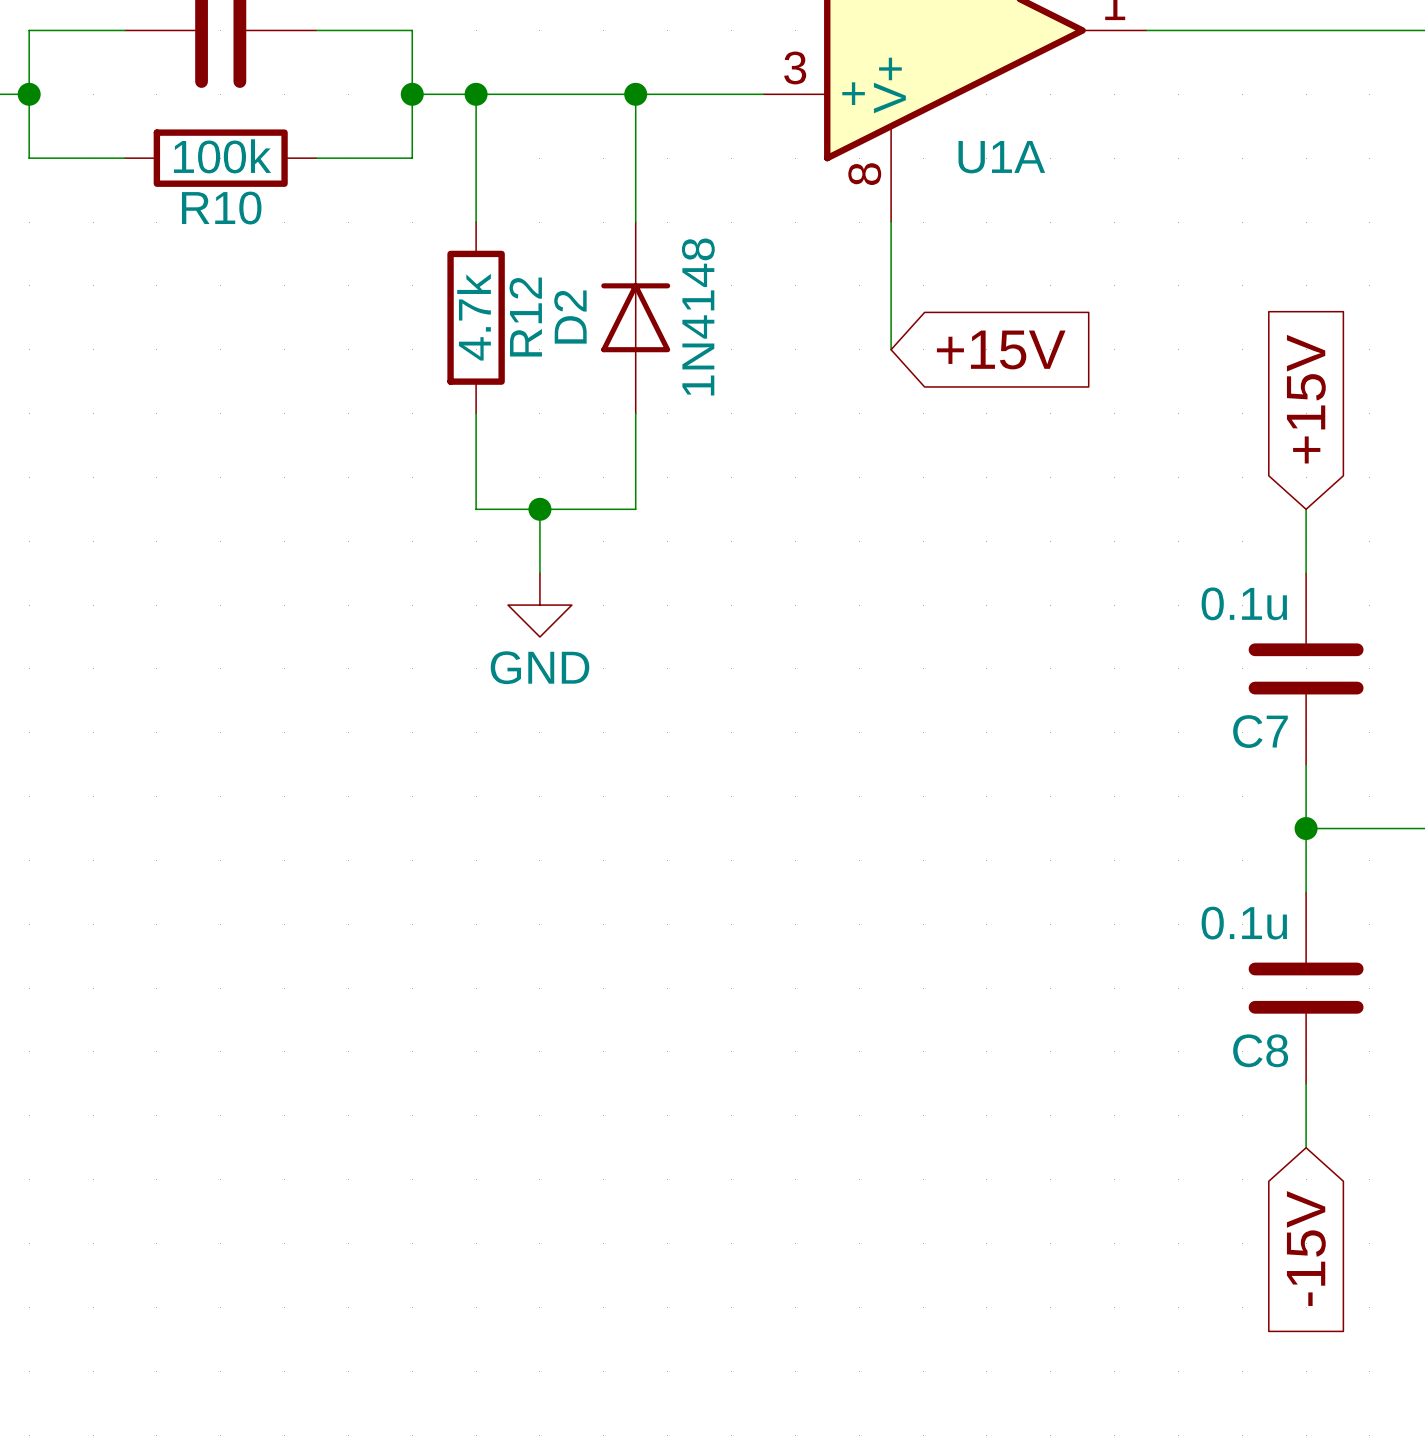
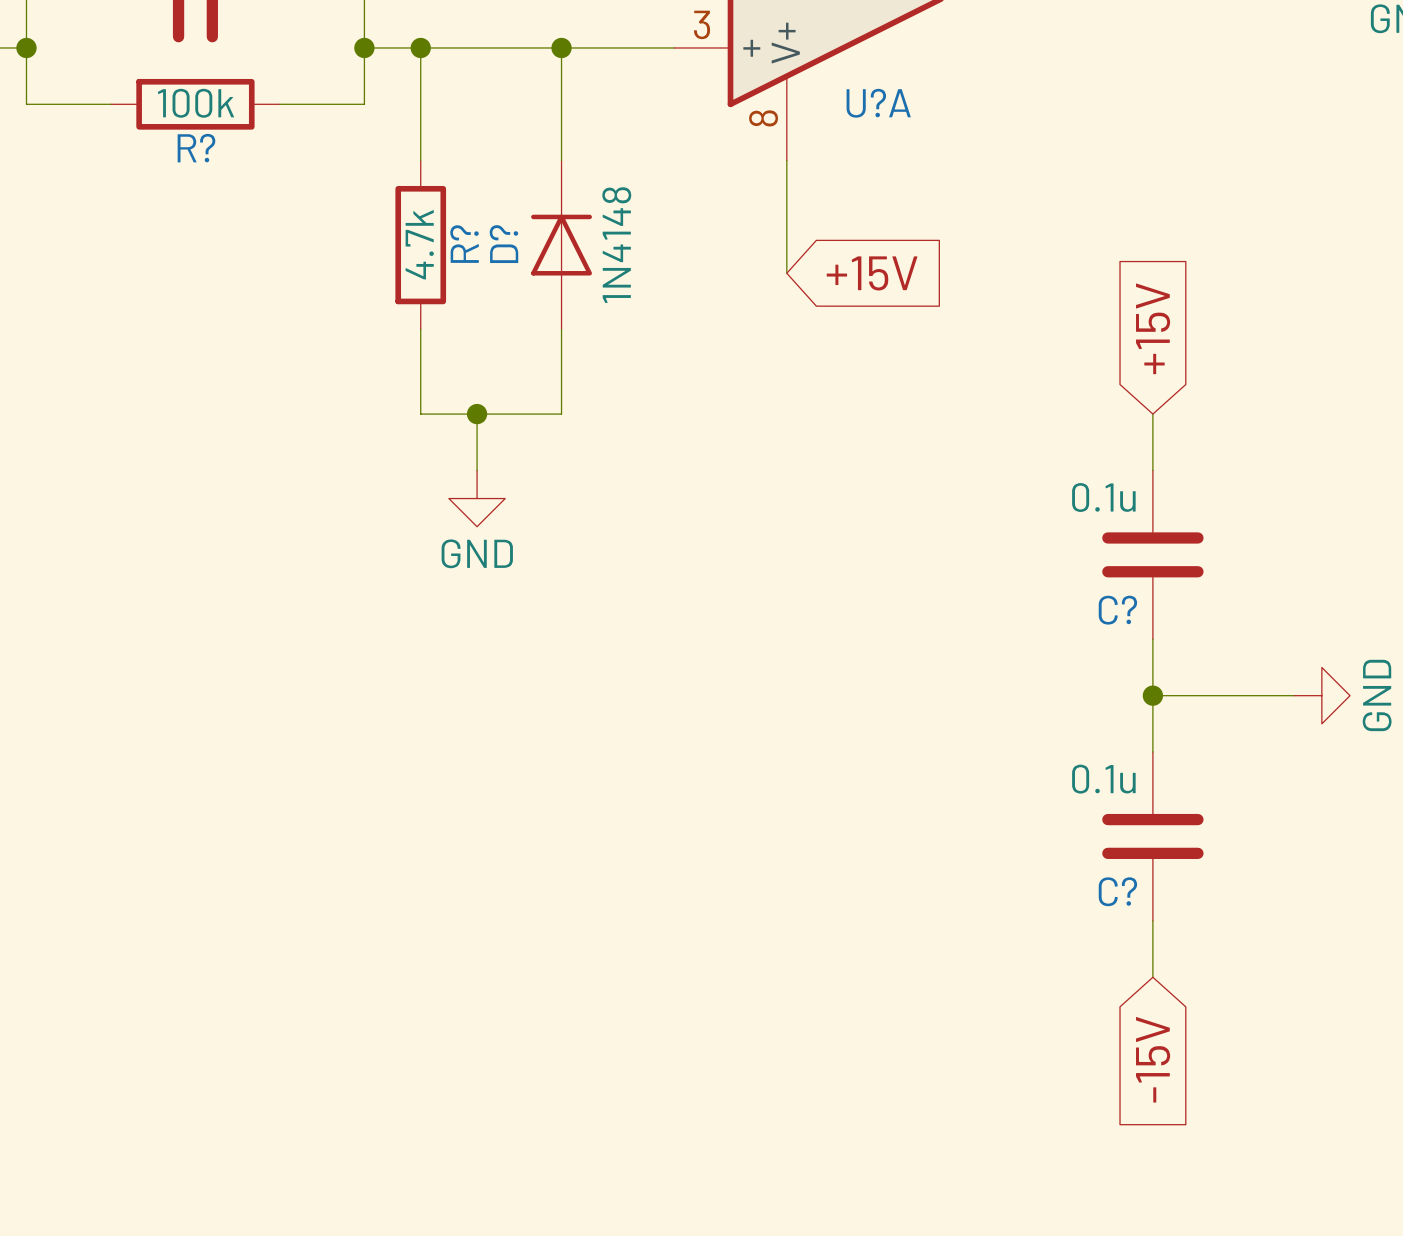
U1A name: U1A (1001, 157) -> U?A (878, 103)
R10 name: R10 (221, 208) -> R? (196, 148)
R12 name: R12 (525, 317) -> R? (464, 244)
D2 name: D2 (570, 317) -> D? (503, 244)
C7 name: C7 (1260, 731) -> C? (1117, 610)
C8 name: C8 (1260, 1050) -> C? (1117, 891)

